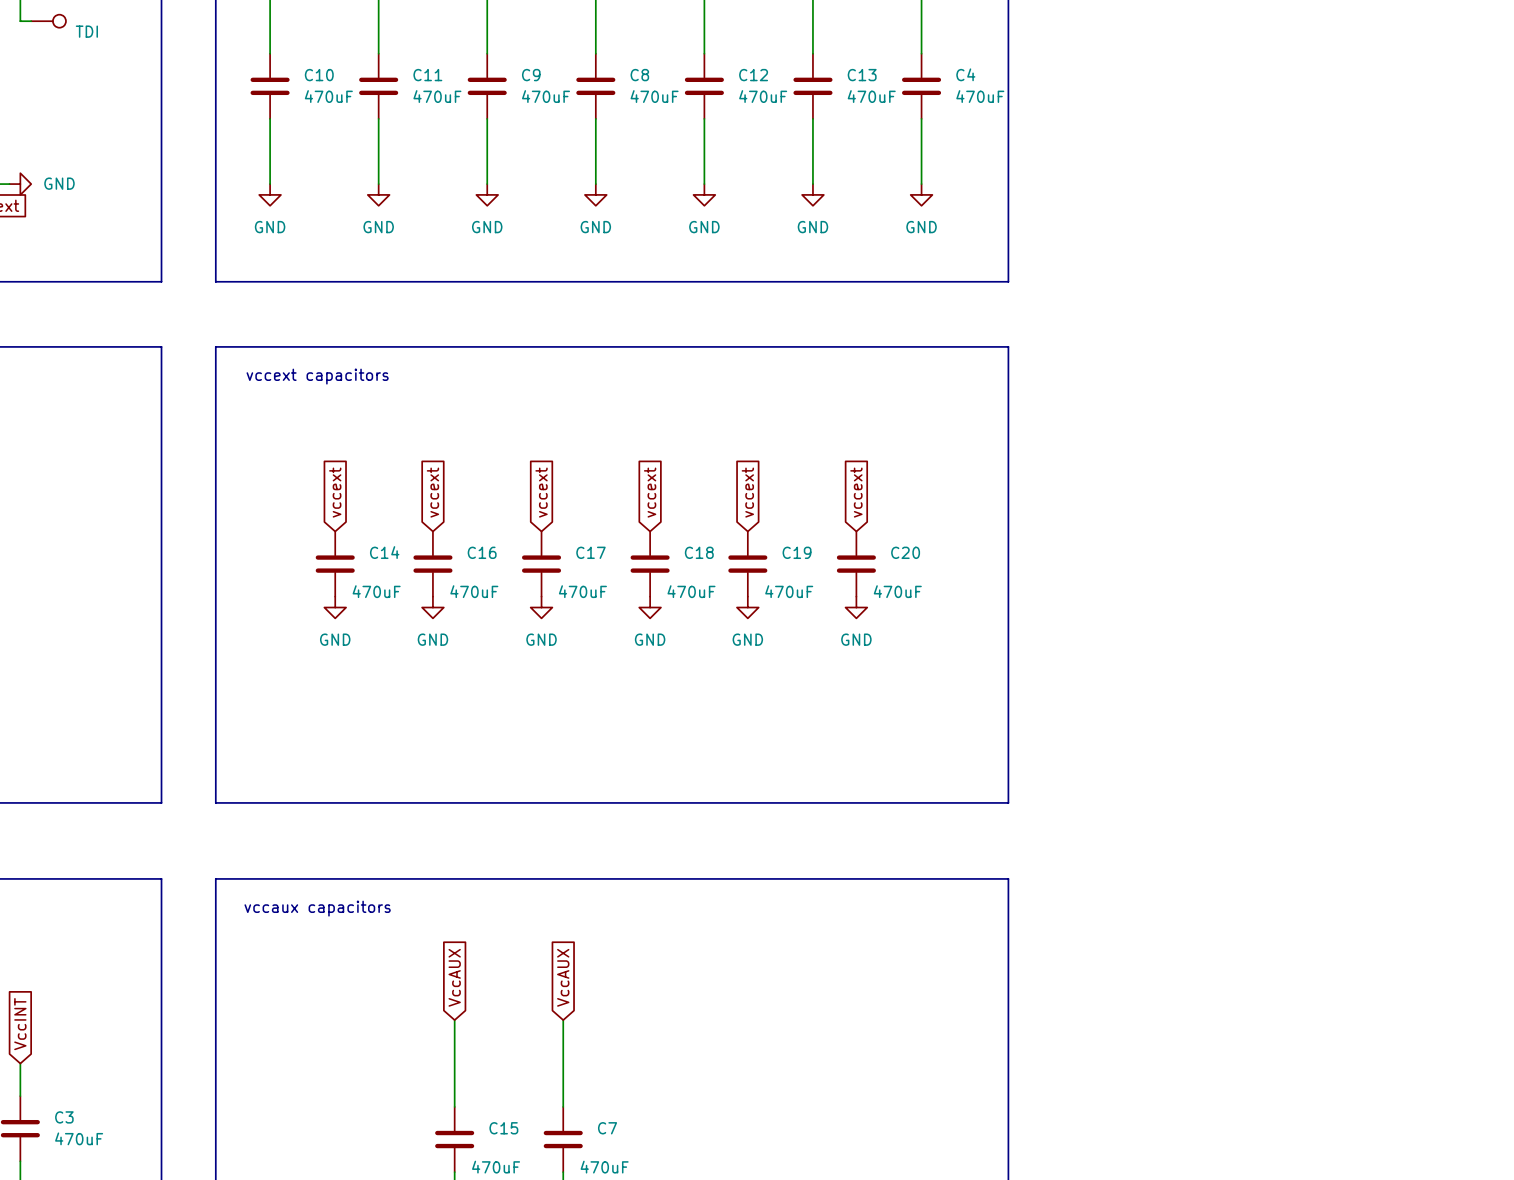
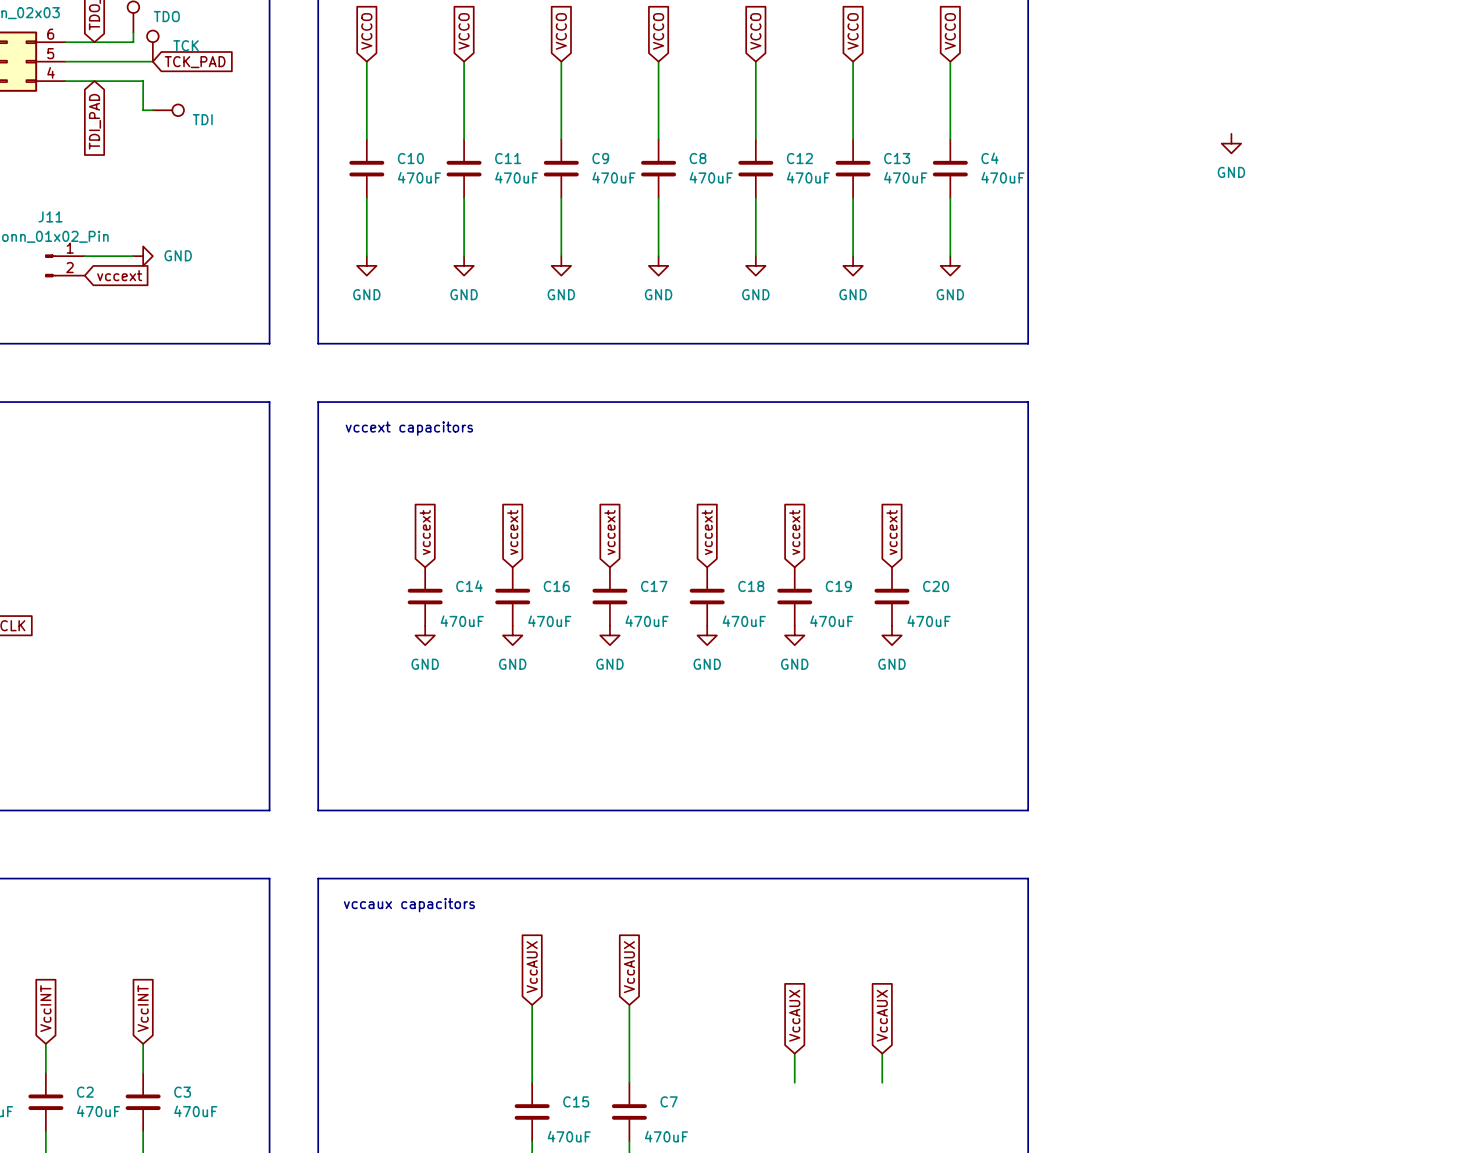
power symbol: none -> GND (1231, 143)
global label: none -> VccAUX (794, 1015)
global label: none -> VccAUX (882, 1015)
wire: none -> (794, 1053) (794, 1082)
wire: none -> (882, 1053) (882, 1082)

